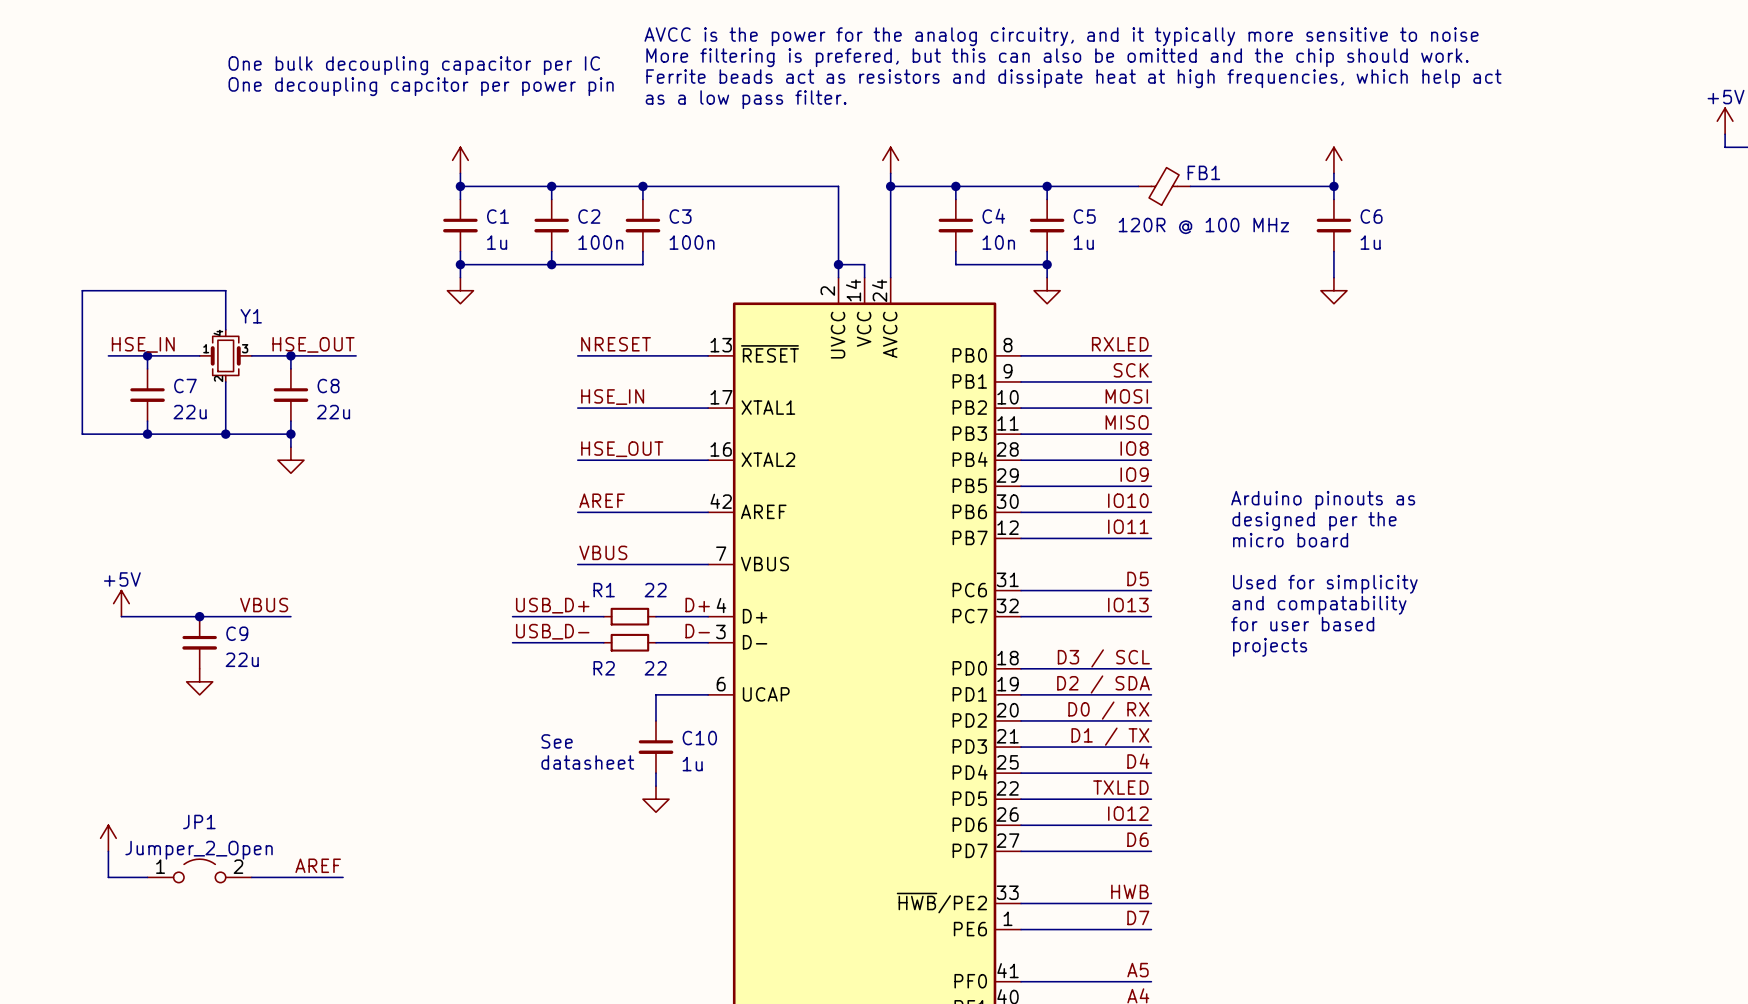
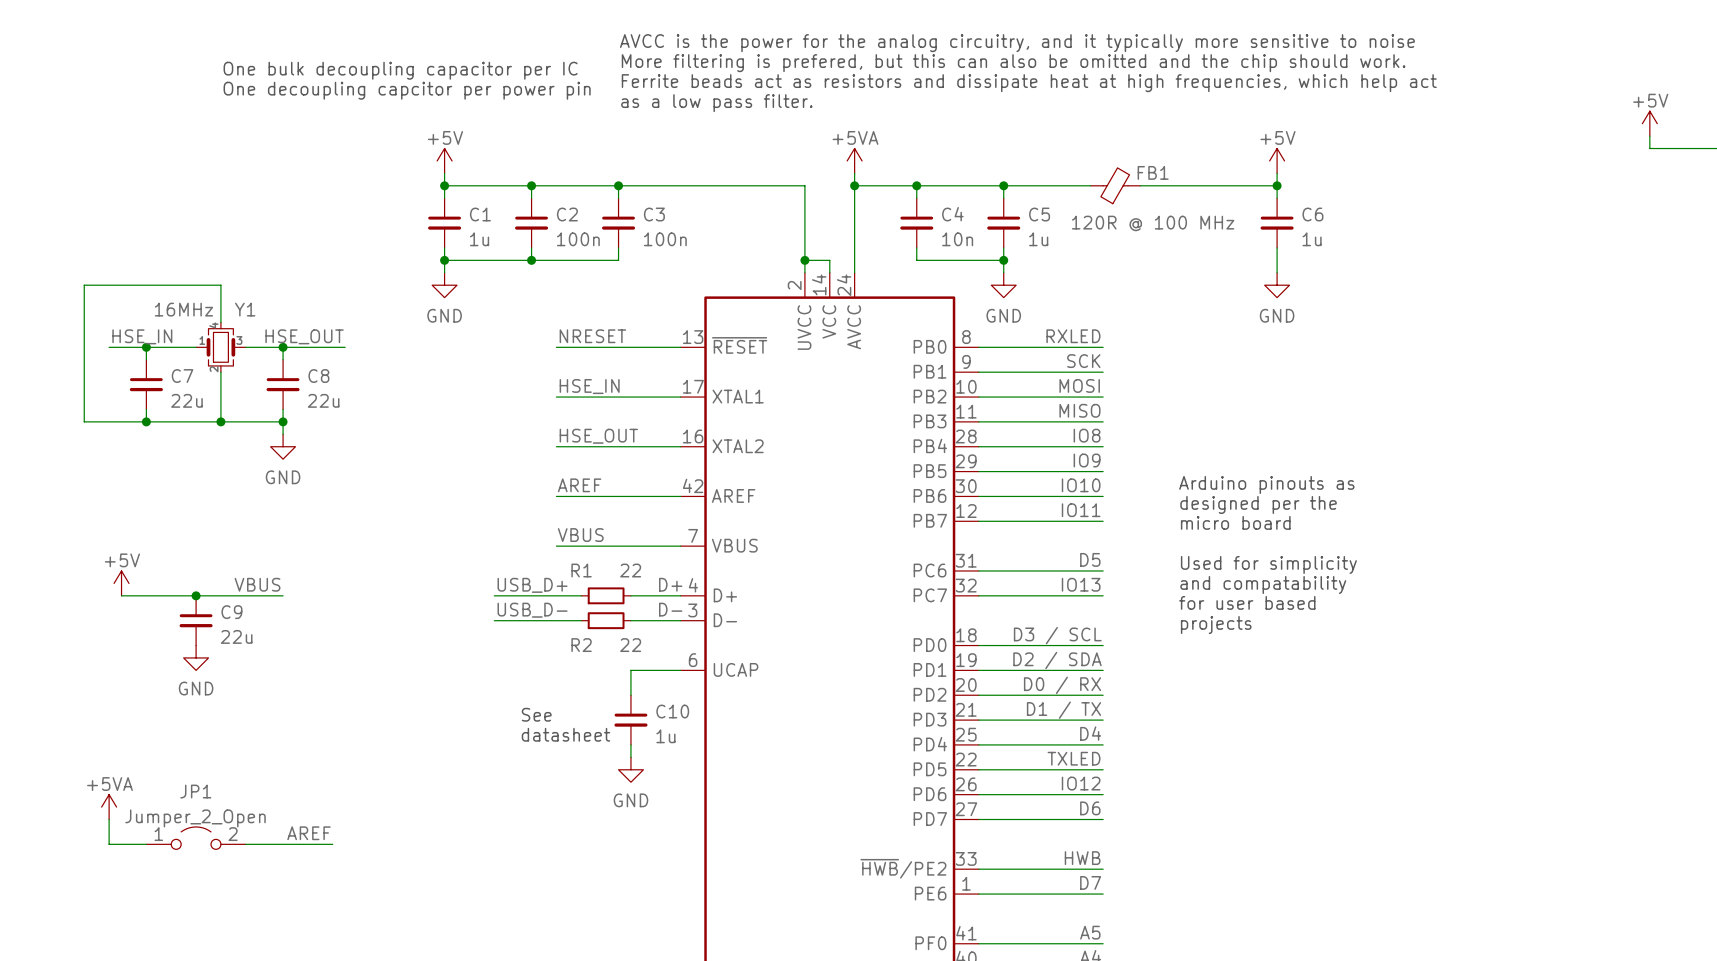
power symbol text: none -> +5V (445, 137)
power symbol text: none -> +5VA (855, 137)
power symbol text: none -> +5V (1277, 137)
Y1 value: none -> 16MHz (183, 309)
power symbol text: none -> GND (444, 315)
power symbol text: none -> GND (1003, 315)
power symbol text: none -> GND (1277, 315)
power symbol text: none -> GND (283, 477)
power symbol text: none -> GND (196, 688)
power symbol text: none -> +5VA (109, 784)
power symbol text: none -> GND (630, 800)

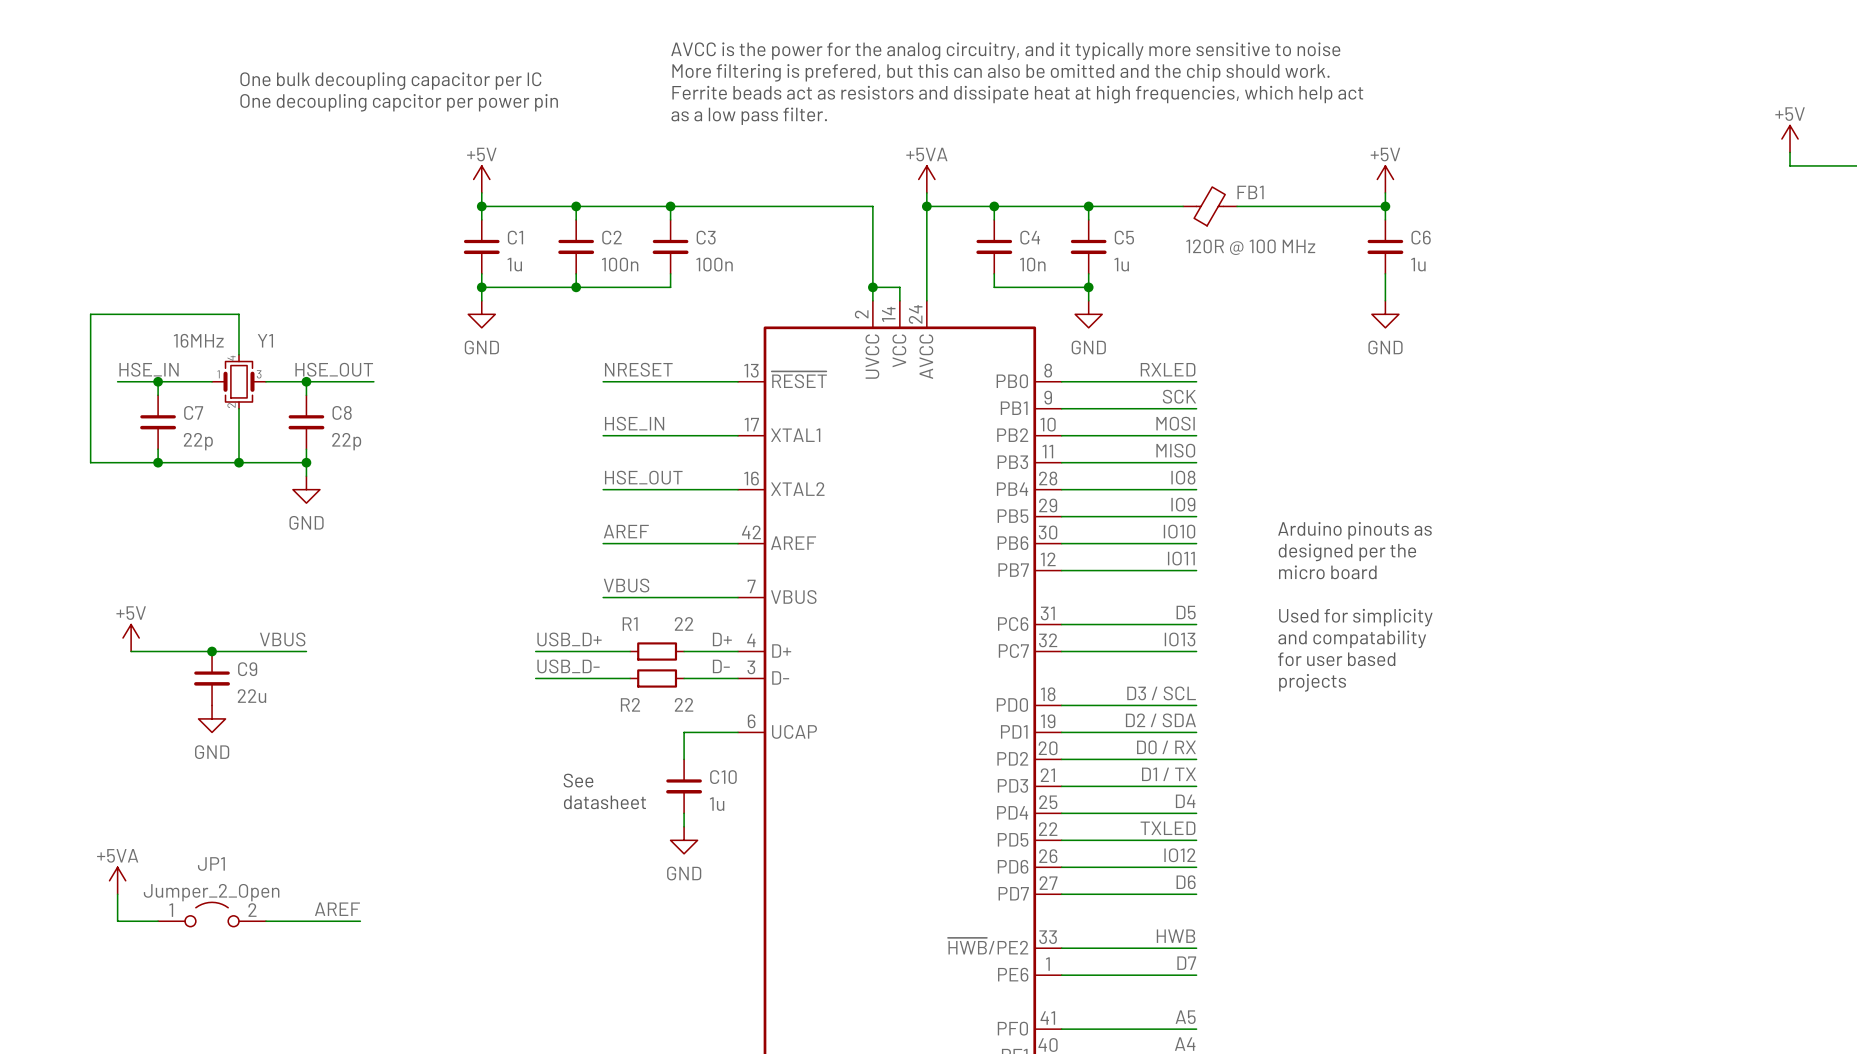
C7 value: 22u (186, 400) -> 22p (198, 441)
C8 value: 22u (323, 400) -> 22p (346, 441)

